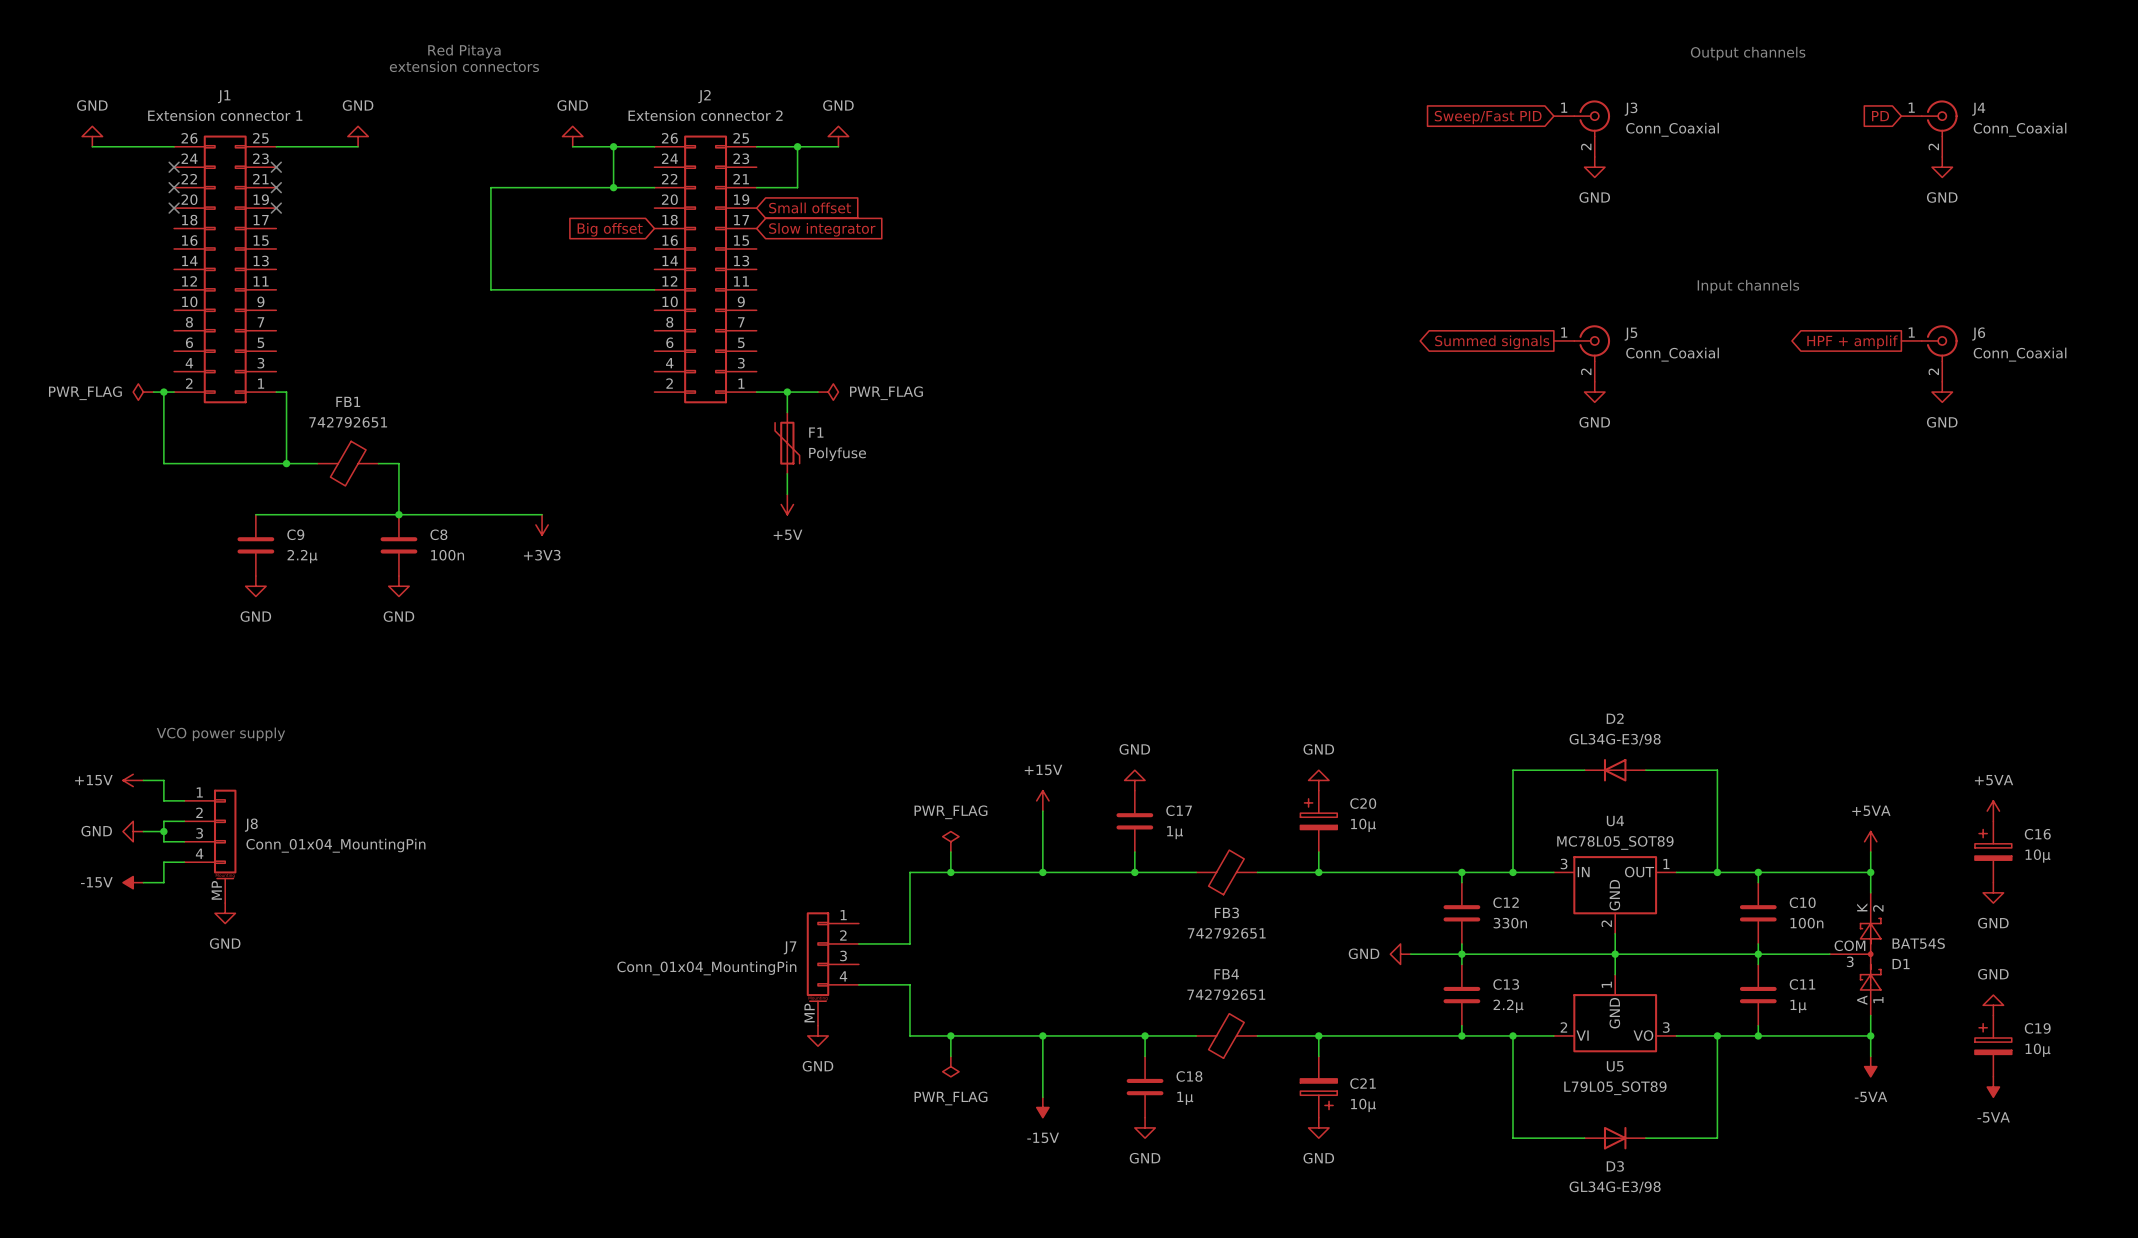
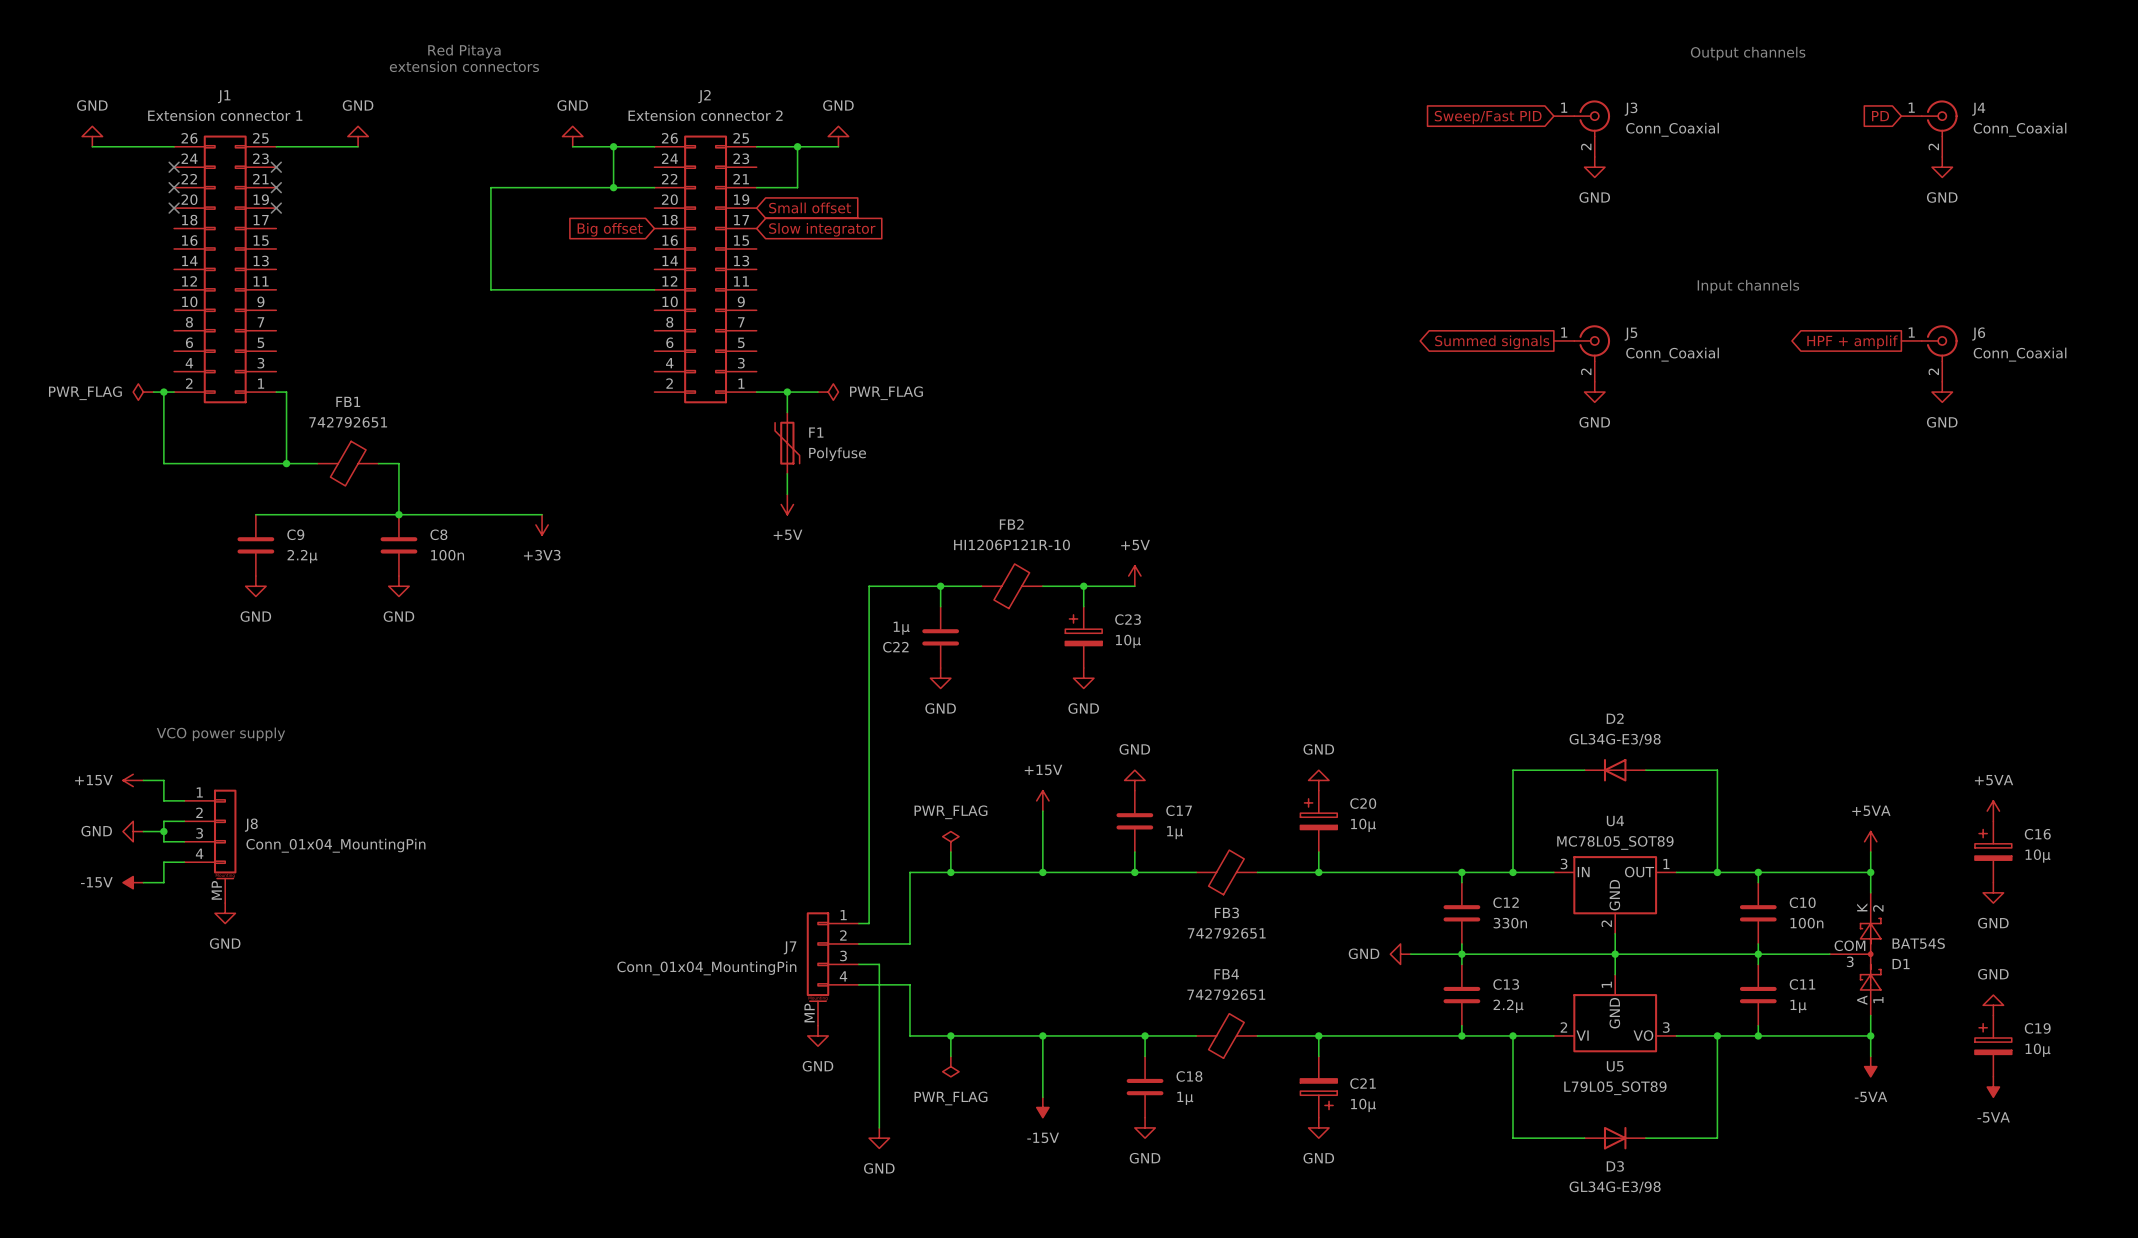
power symbol: none -> +5V (1134, 576)
wire: none -> (940, 586) (940, 606)
junction: none -> (940, 586)
wire: none -> (981, 586) (869, 586) (869, 923) (858, 923)
FB2: none -> HI1206P121R-10 (1012, 586)
wire: none -> (1042, 586) (1134, 586)
wire: none -> (1083, 586) (1083, 606)
junction: none -> (1083, 586)
C22: none -> 1µ (940, 637)
C23: none -> 10µ (1083, 637)
power symbol: none -> GND (940, 678)
power symbol: none -> GND (1083, 678)
wire: none -> (858, 964) (879, 964) (879, 1127)
power symbol: none -> GND (879, 1138)

